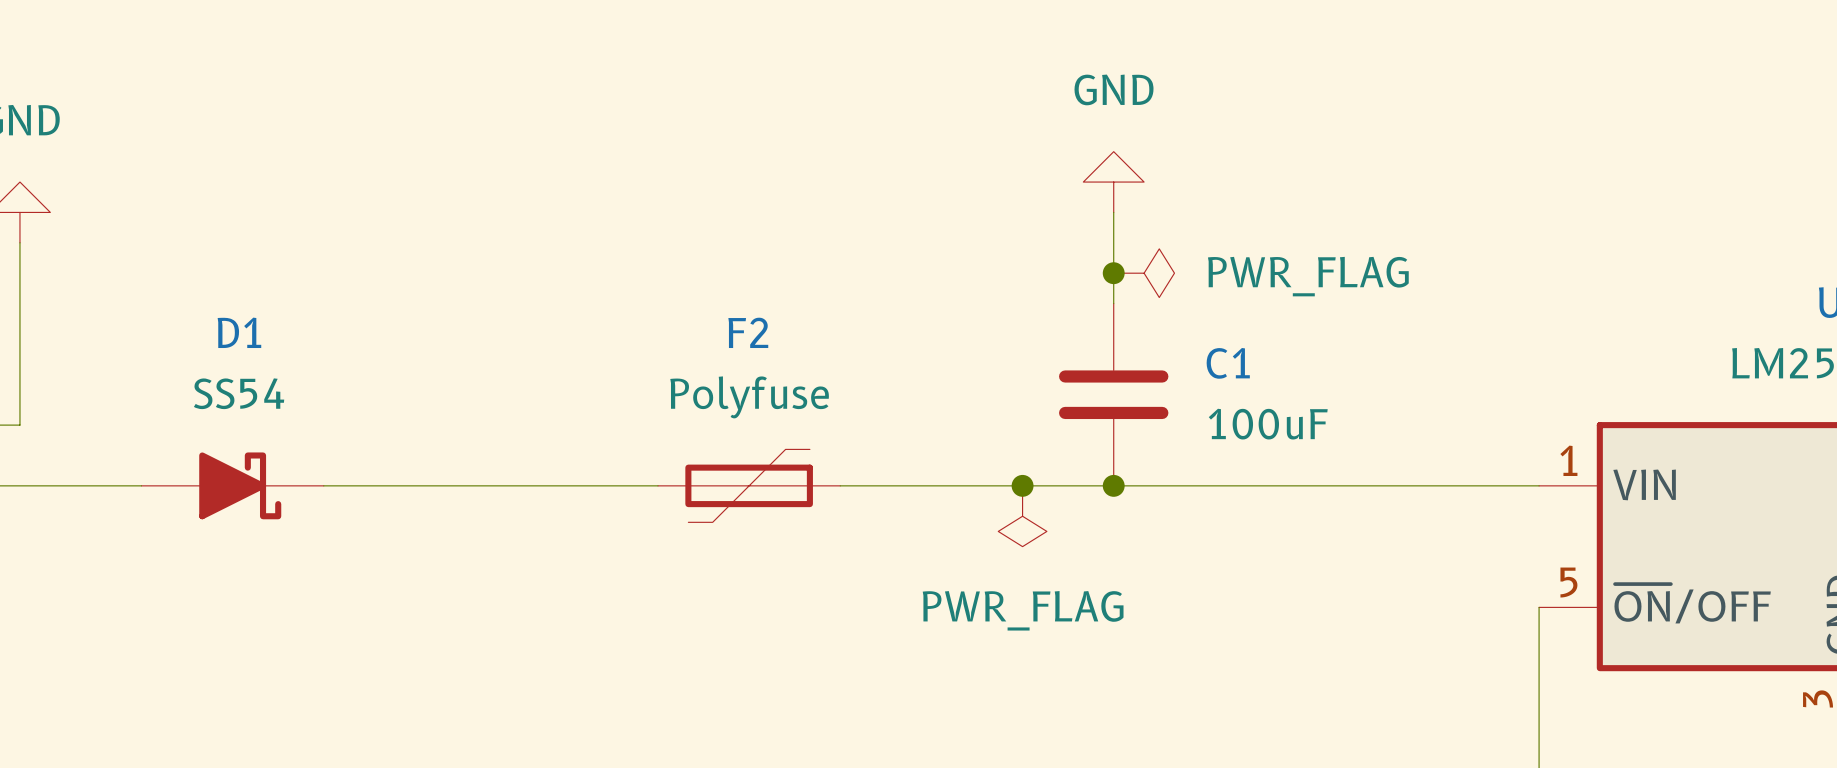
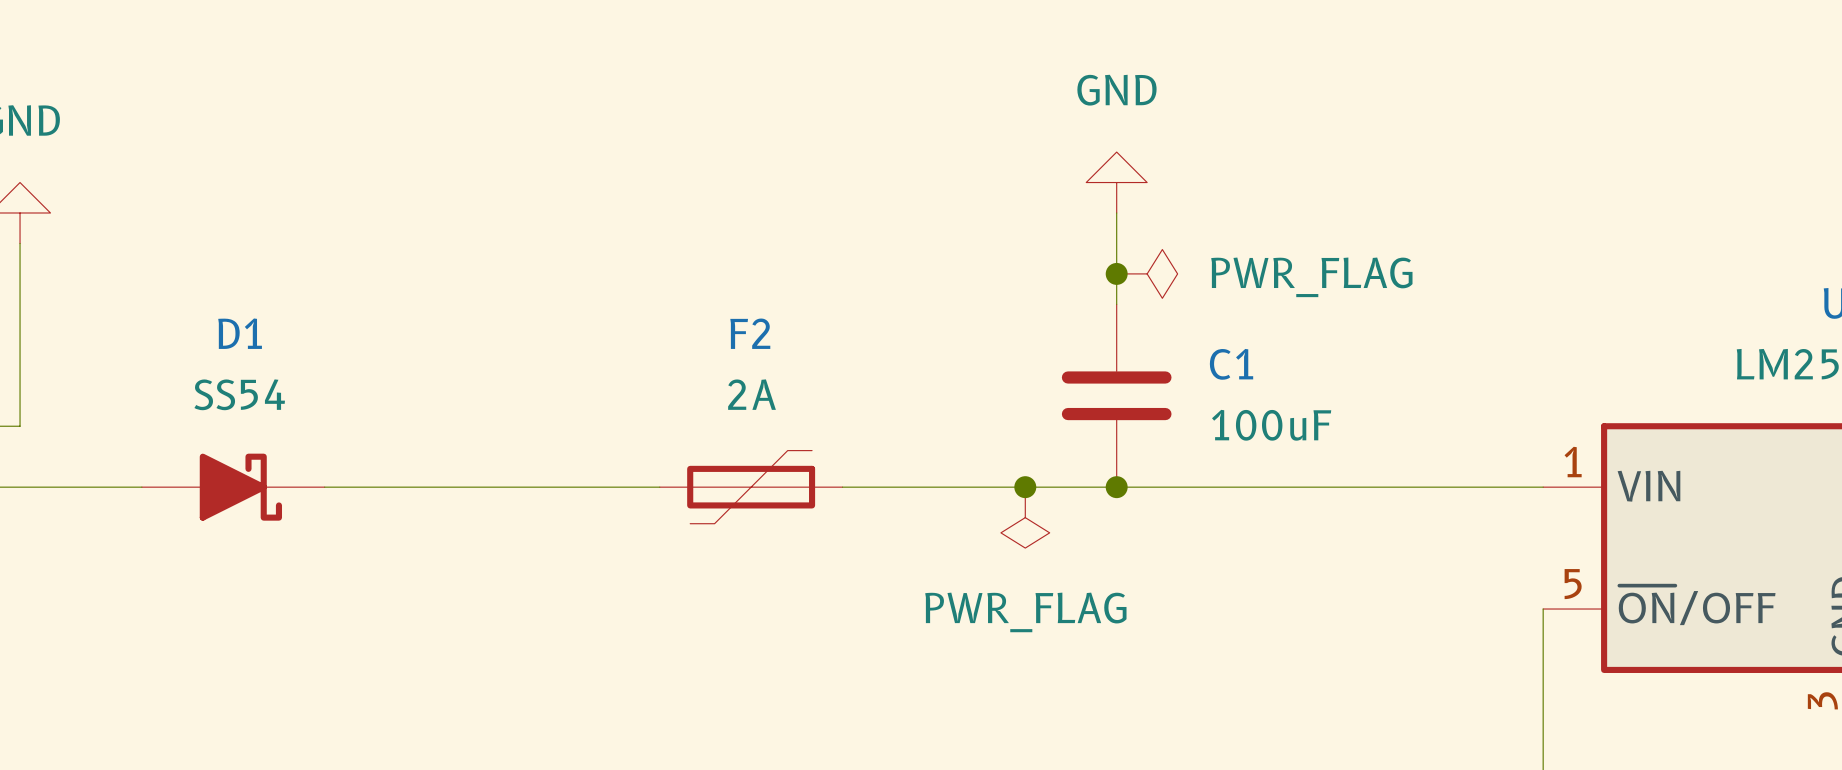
F2 value: Polyfuse (749, 397) -> 2A (752, 394)

